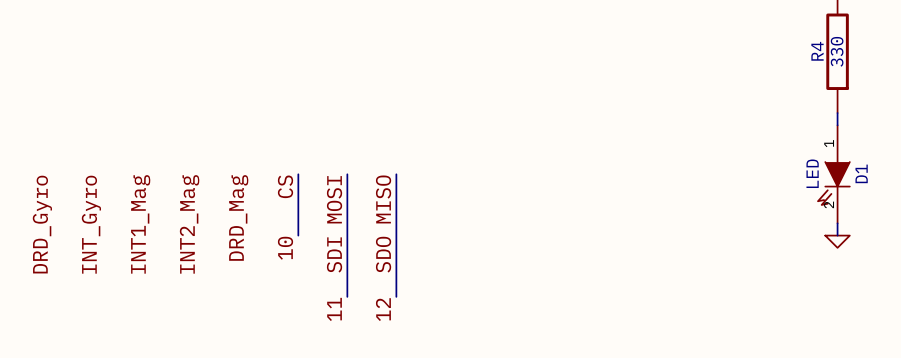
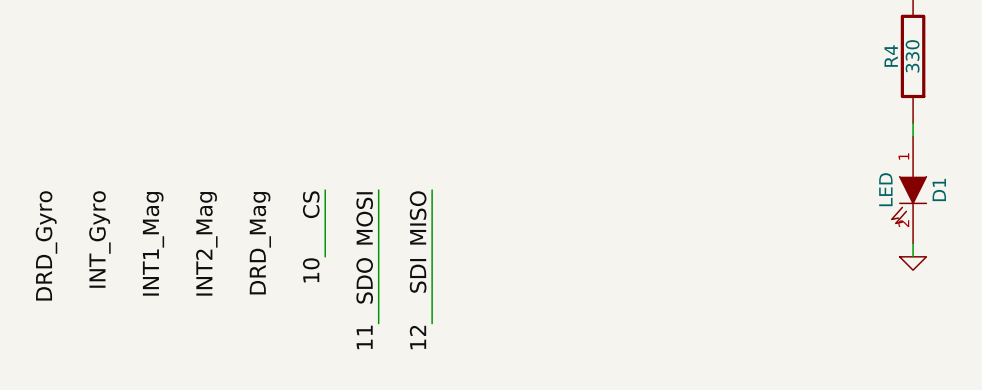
label: SDI (334, 254) -> SDO (364, 280)
label: SDO (383, 254) -> SDI (418, 275)

